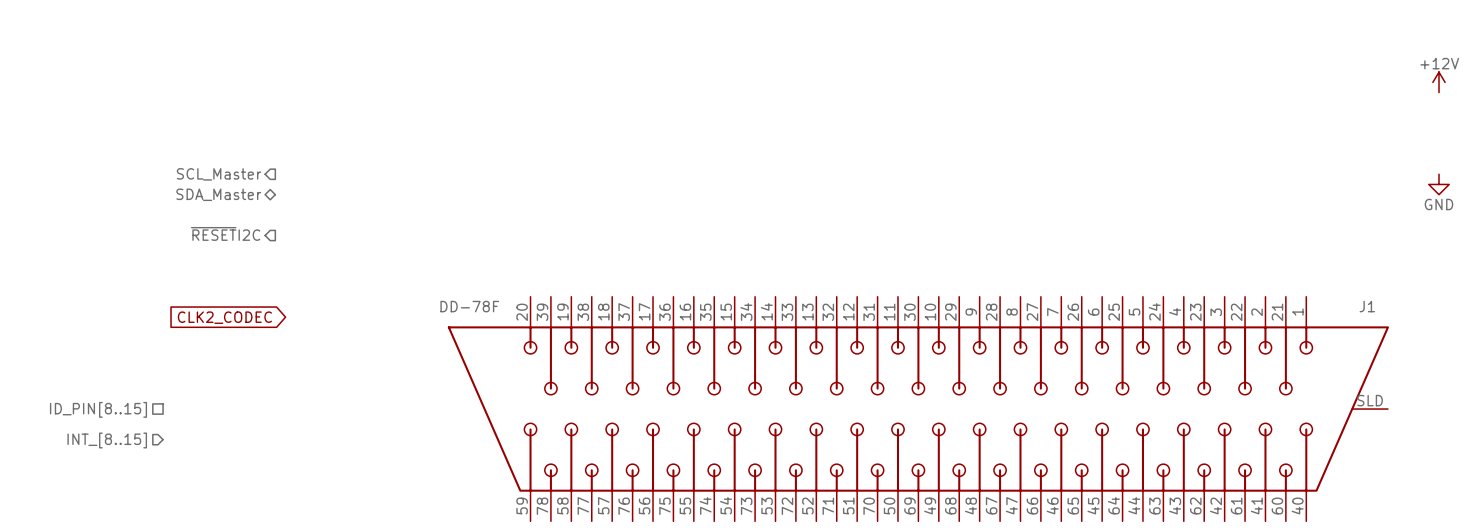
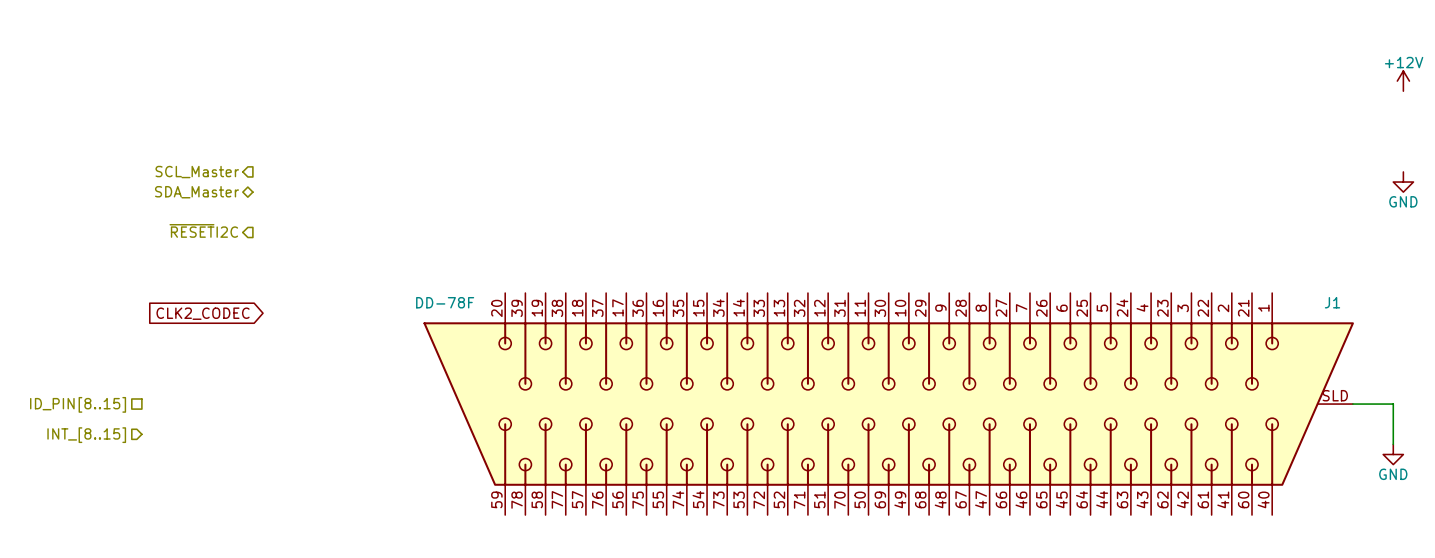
wire: none -> (1352, 404) (1393, 404) (1393, 444)
power symbol: none -> GND (1393, 454)

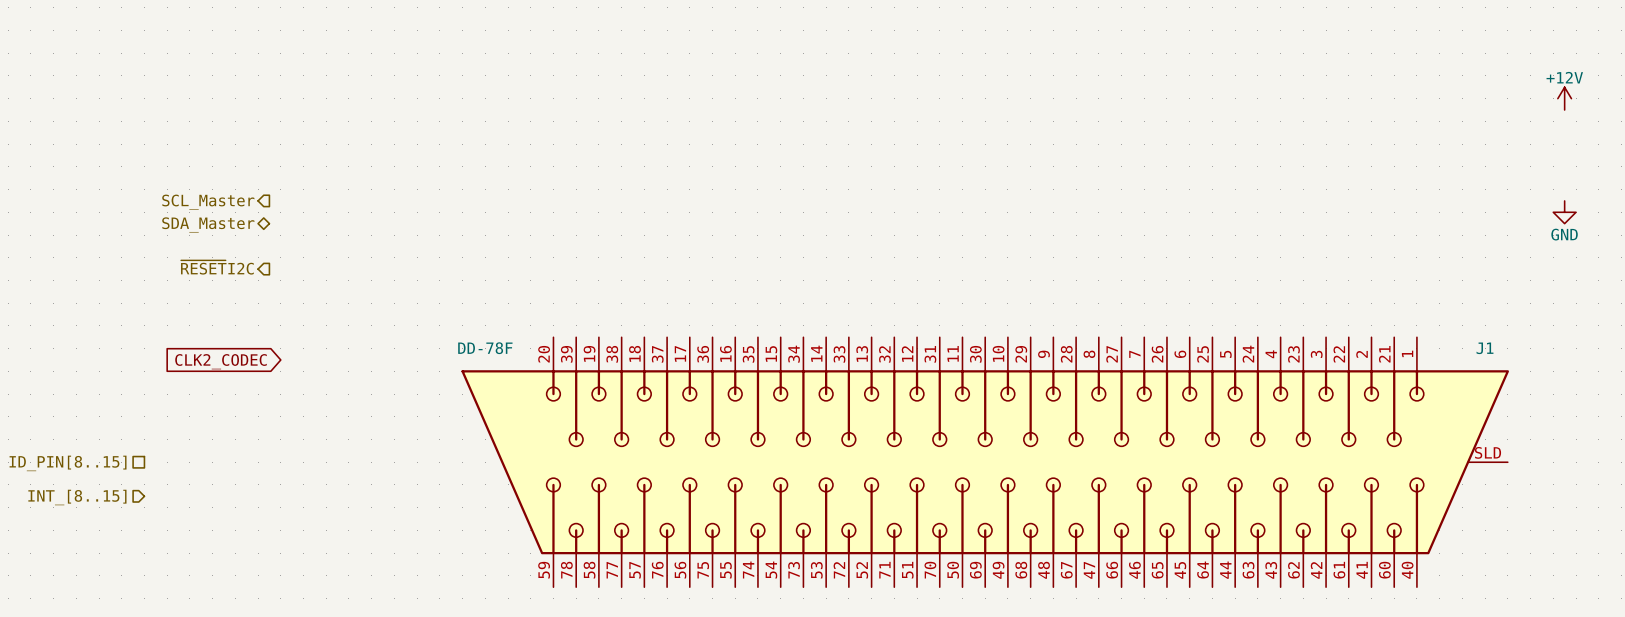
wire: (1352, 404) (1393, 404) (1393, 444) -> none
power symbol: GND (1393, 454) -> none

